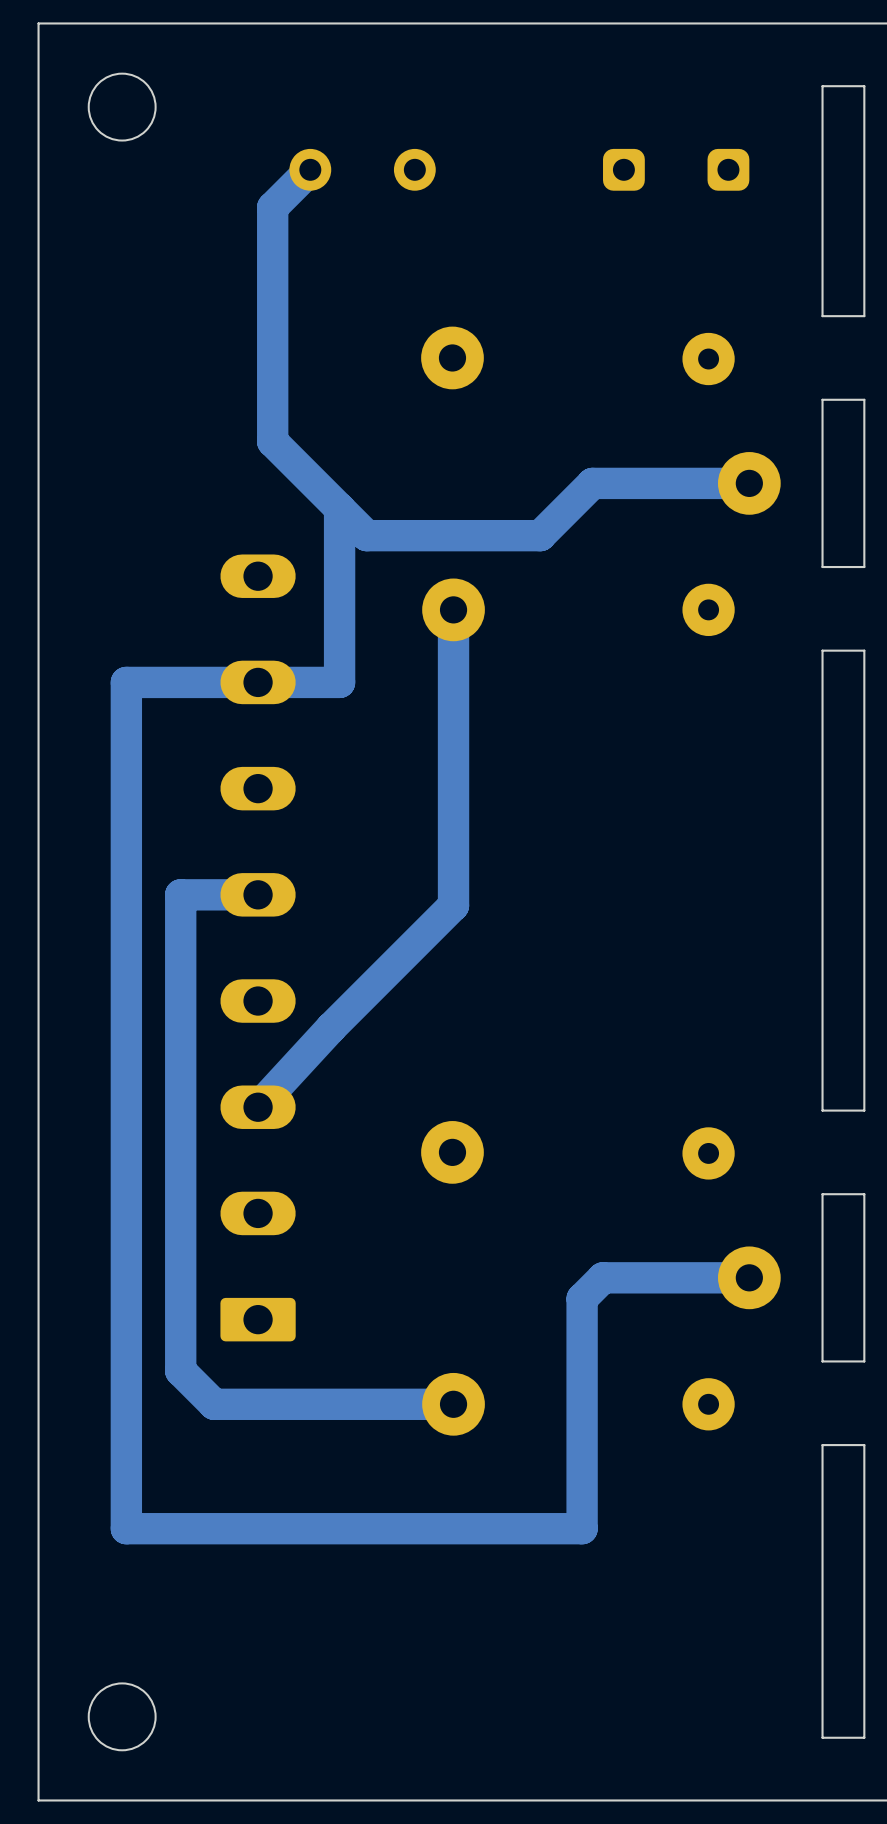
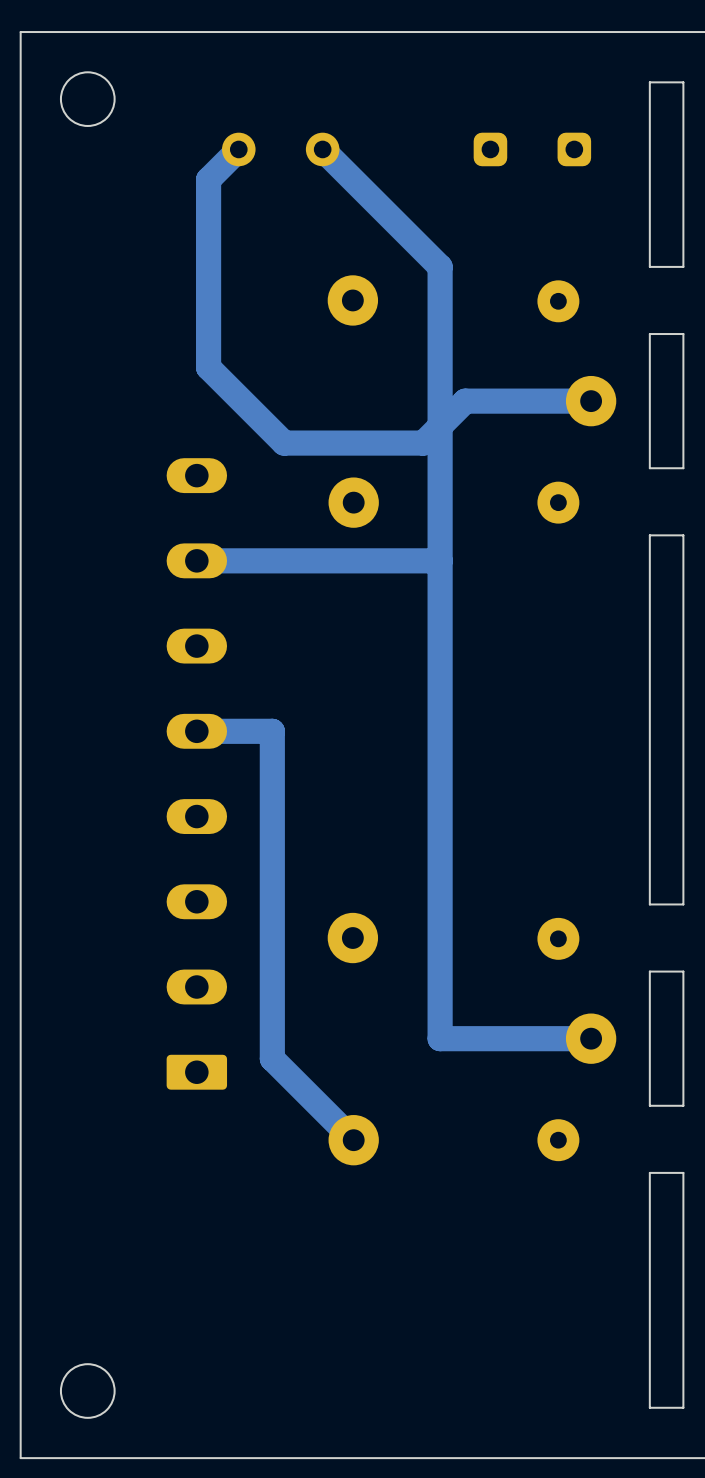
track: (339, 508) (339, 682) -> (440, 560) (262, 560)
track: (453, 609) (453, 905) (331, 1027) (258, 1107) -> none
track: (258, 682) (126, 682) (126, 1528) (582, 1528) (582, 1298) (603, 1277) -> (322, 149) (440, 266) (440, 1038) (473, 1038)
track: (258, 894) (180, 894) (180, 1370) (214, 1404) (453, 1404) -> (196, 731) (272, 731) (272, 1058) (353, 1140)

